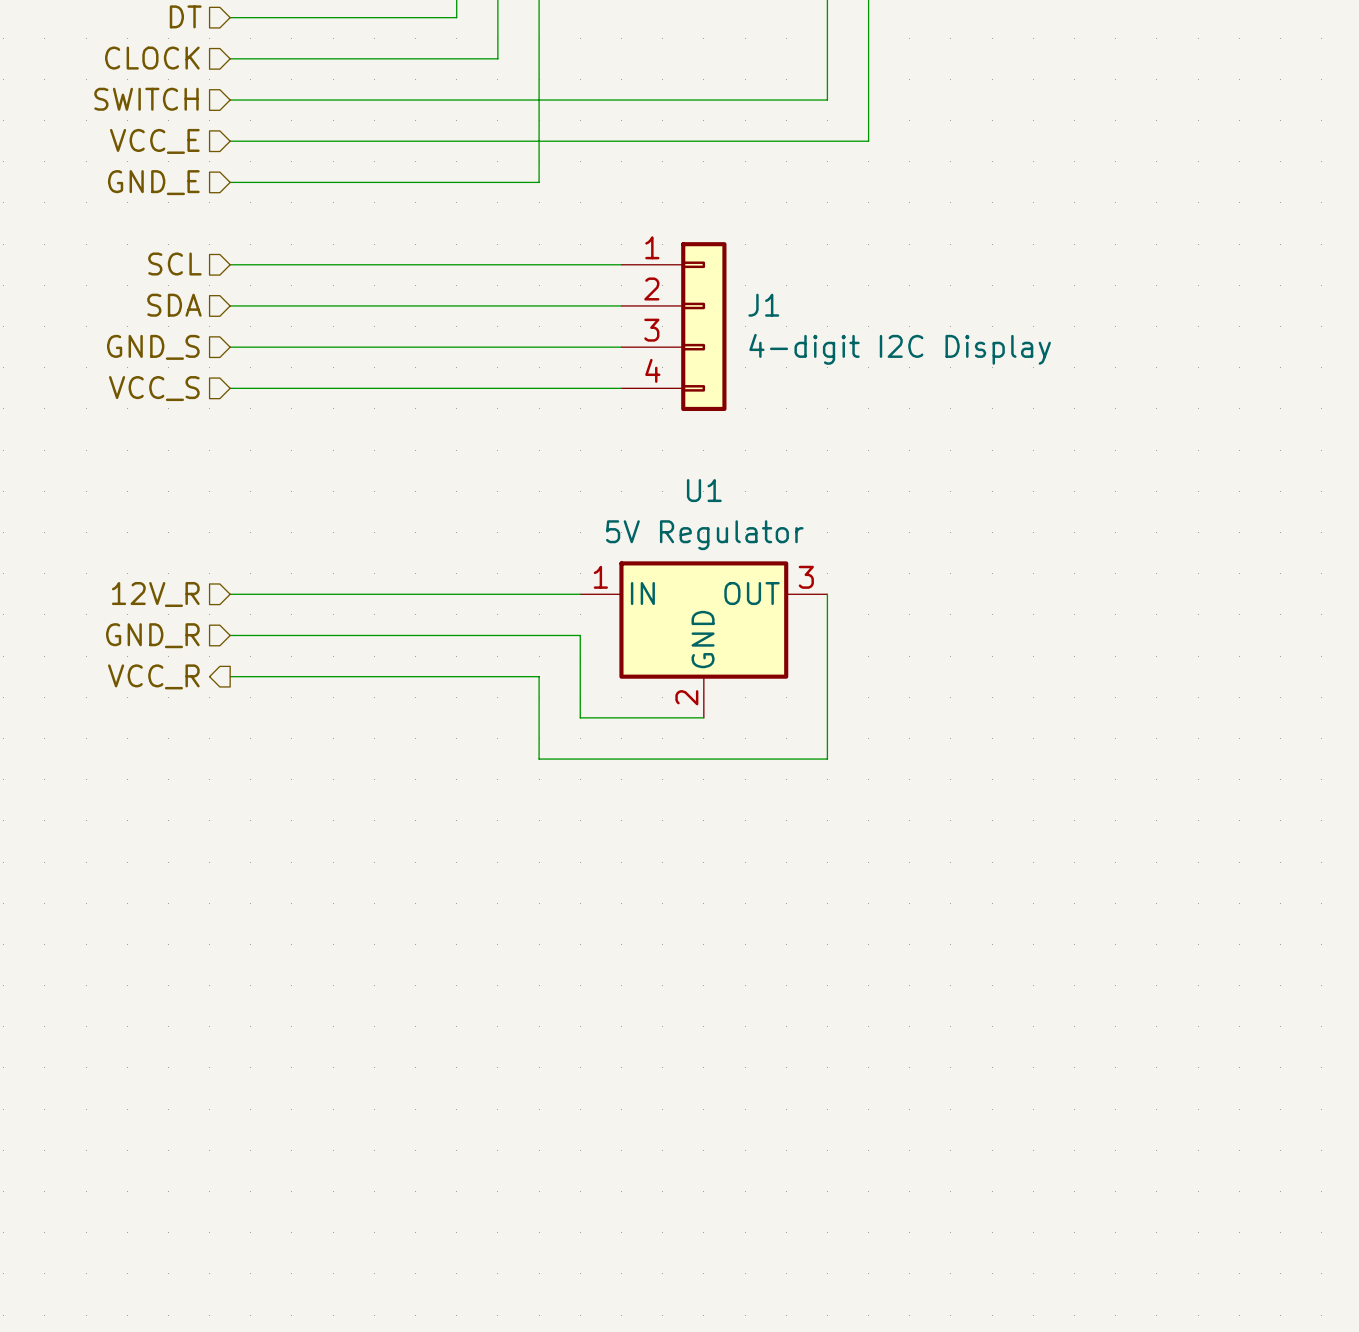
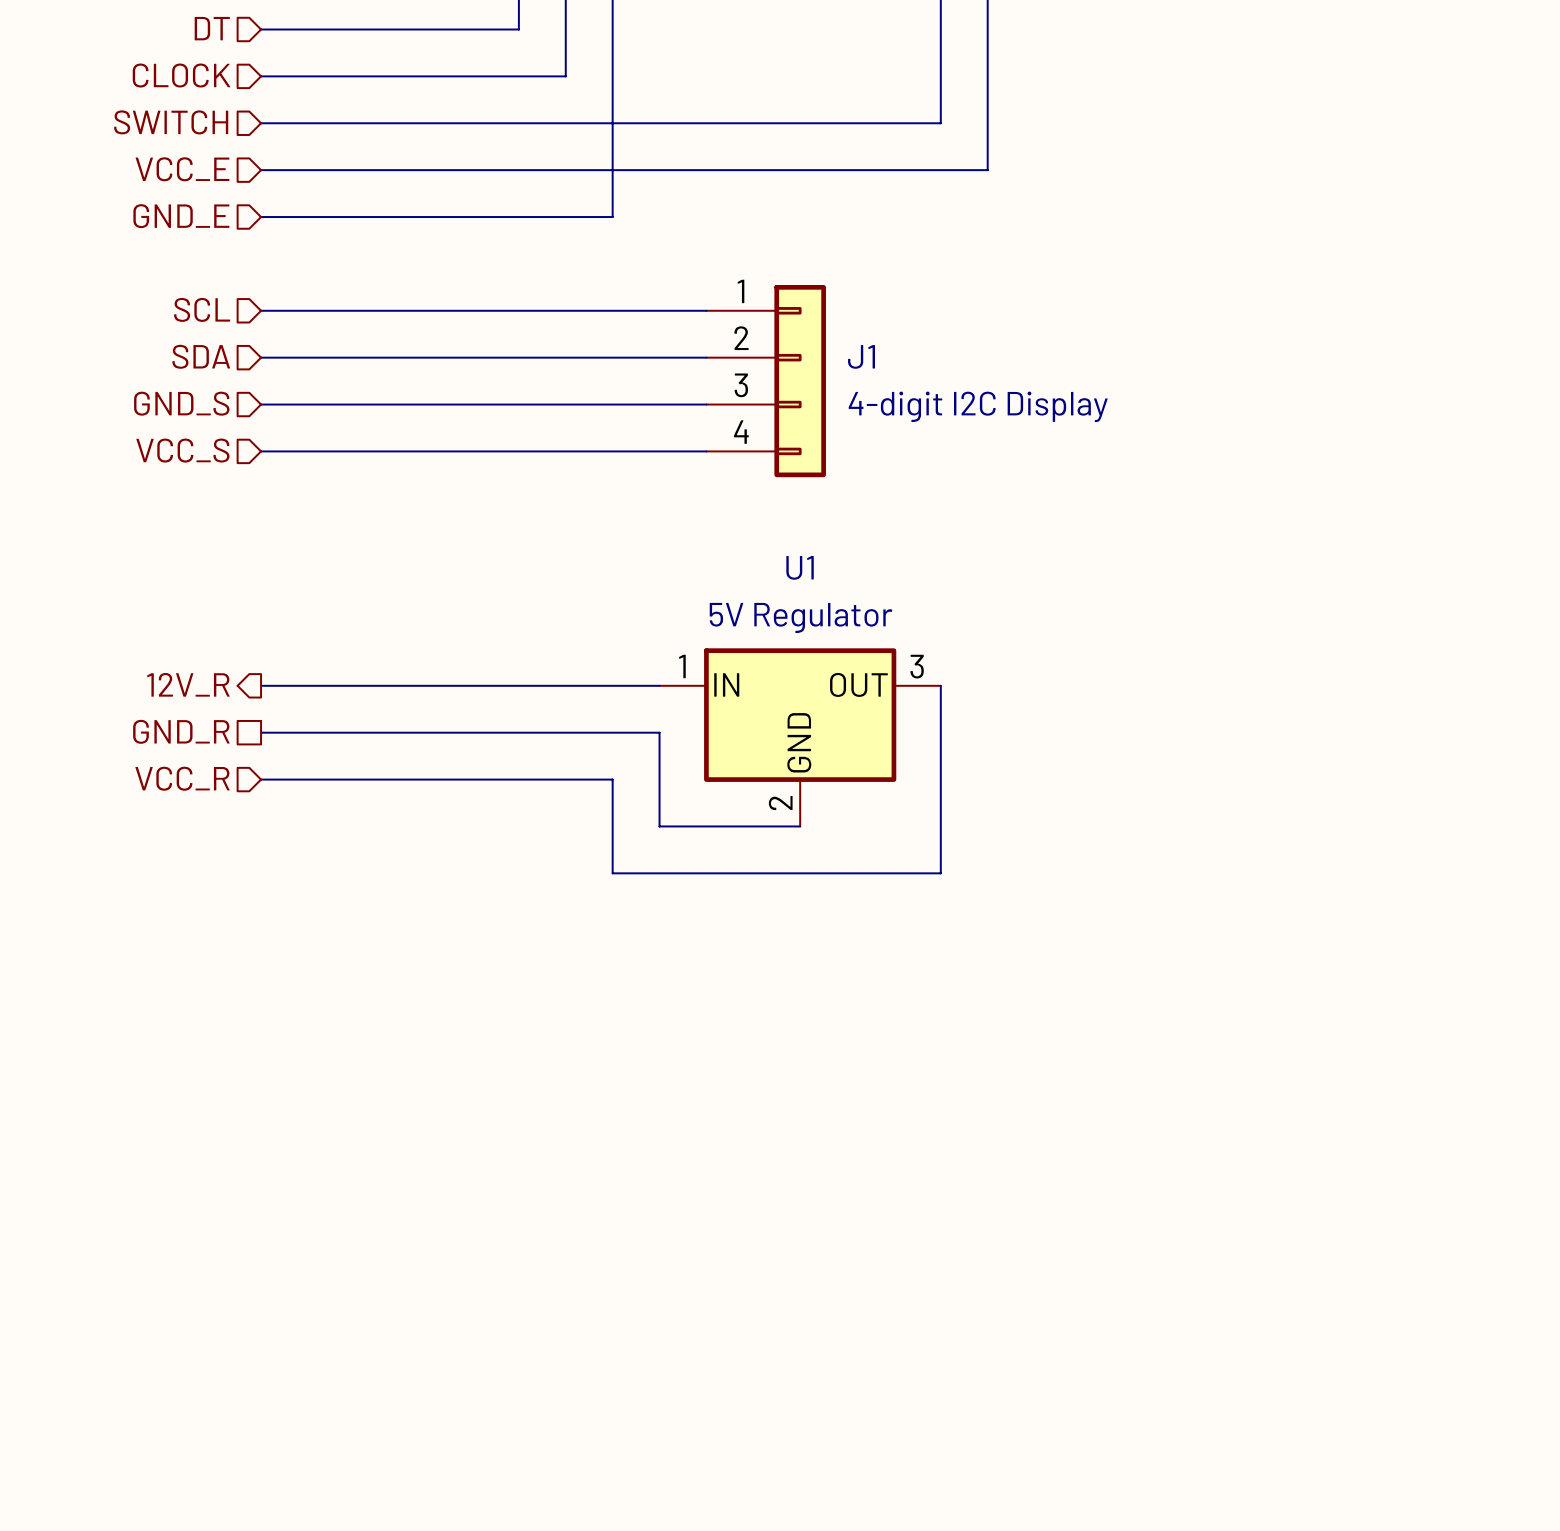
hierarchical label shape: input (155, 594) -> output (188, 684)
hierarchical label shape: input (152, 635) -> passive (181, 731)
hierarchical label shape: output (153, 676) -> input (182, 778)

